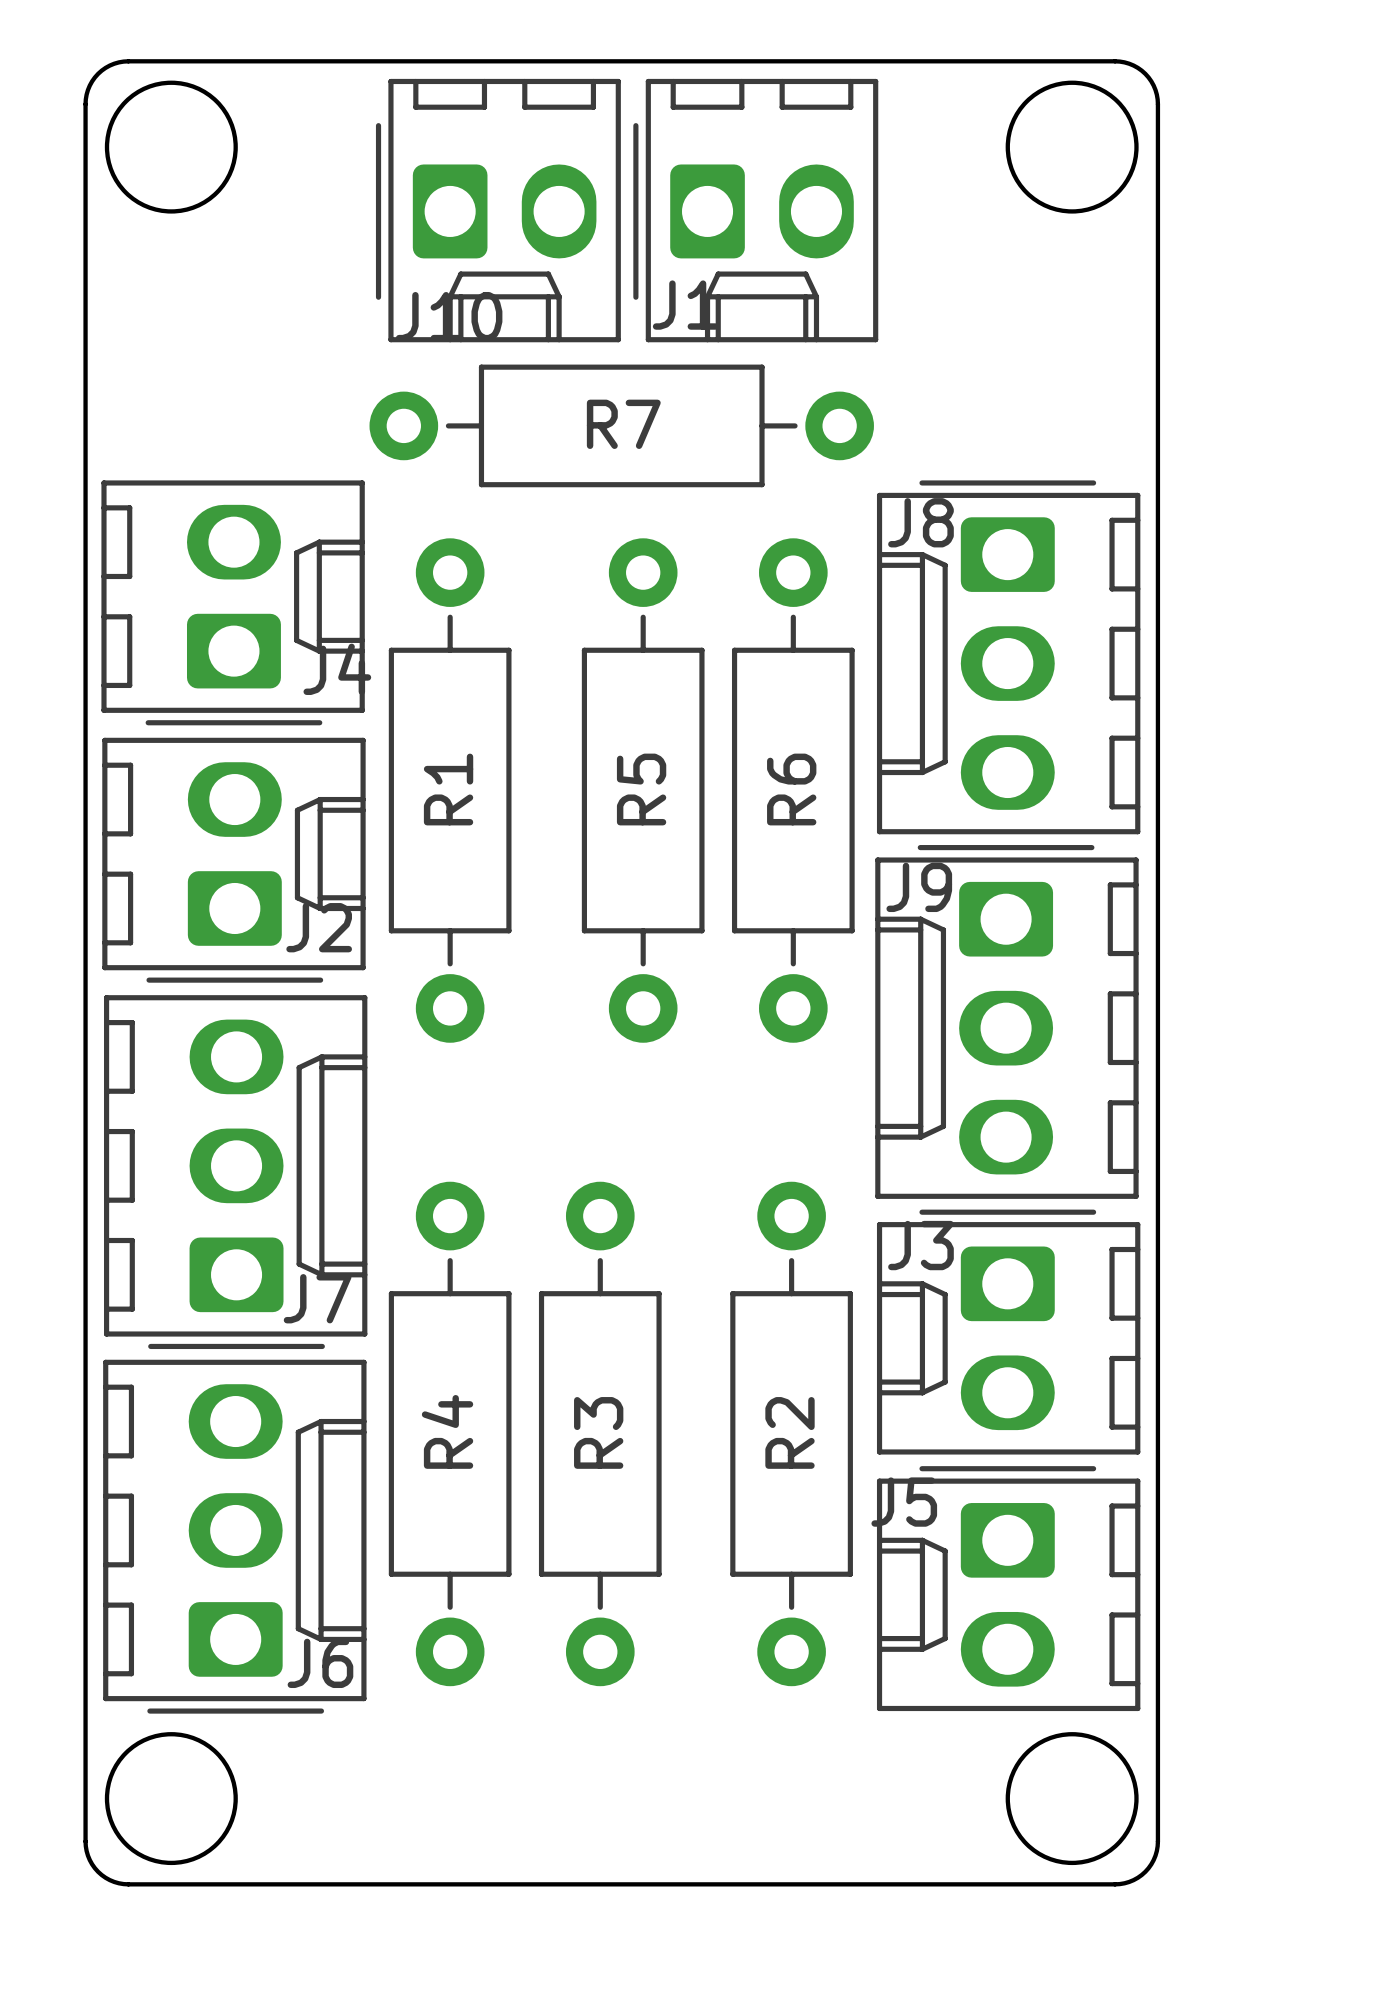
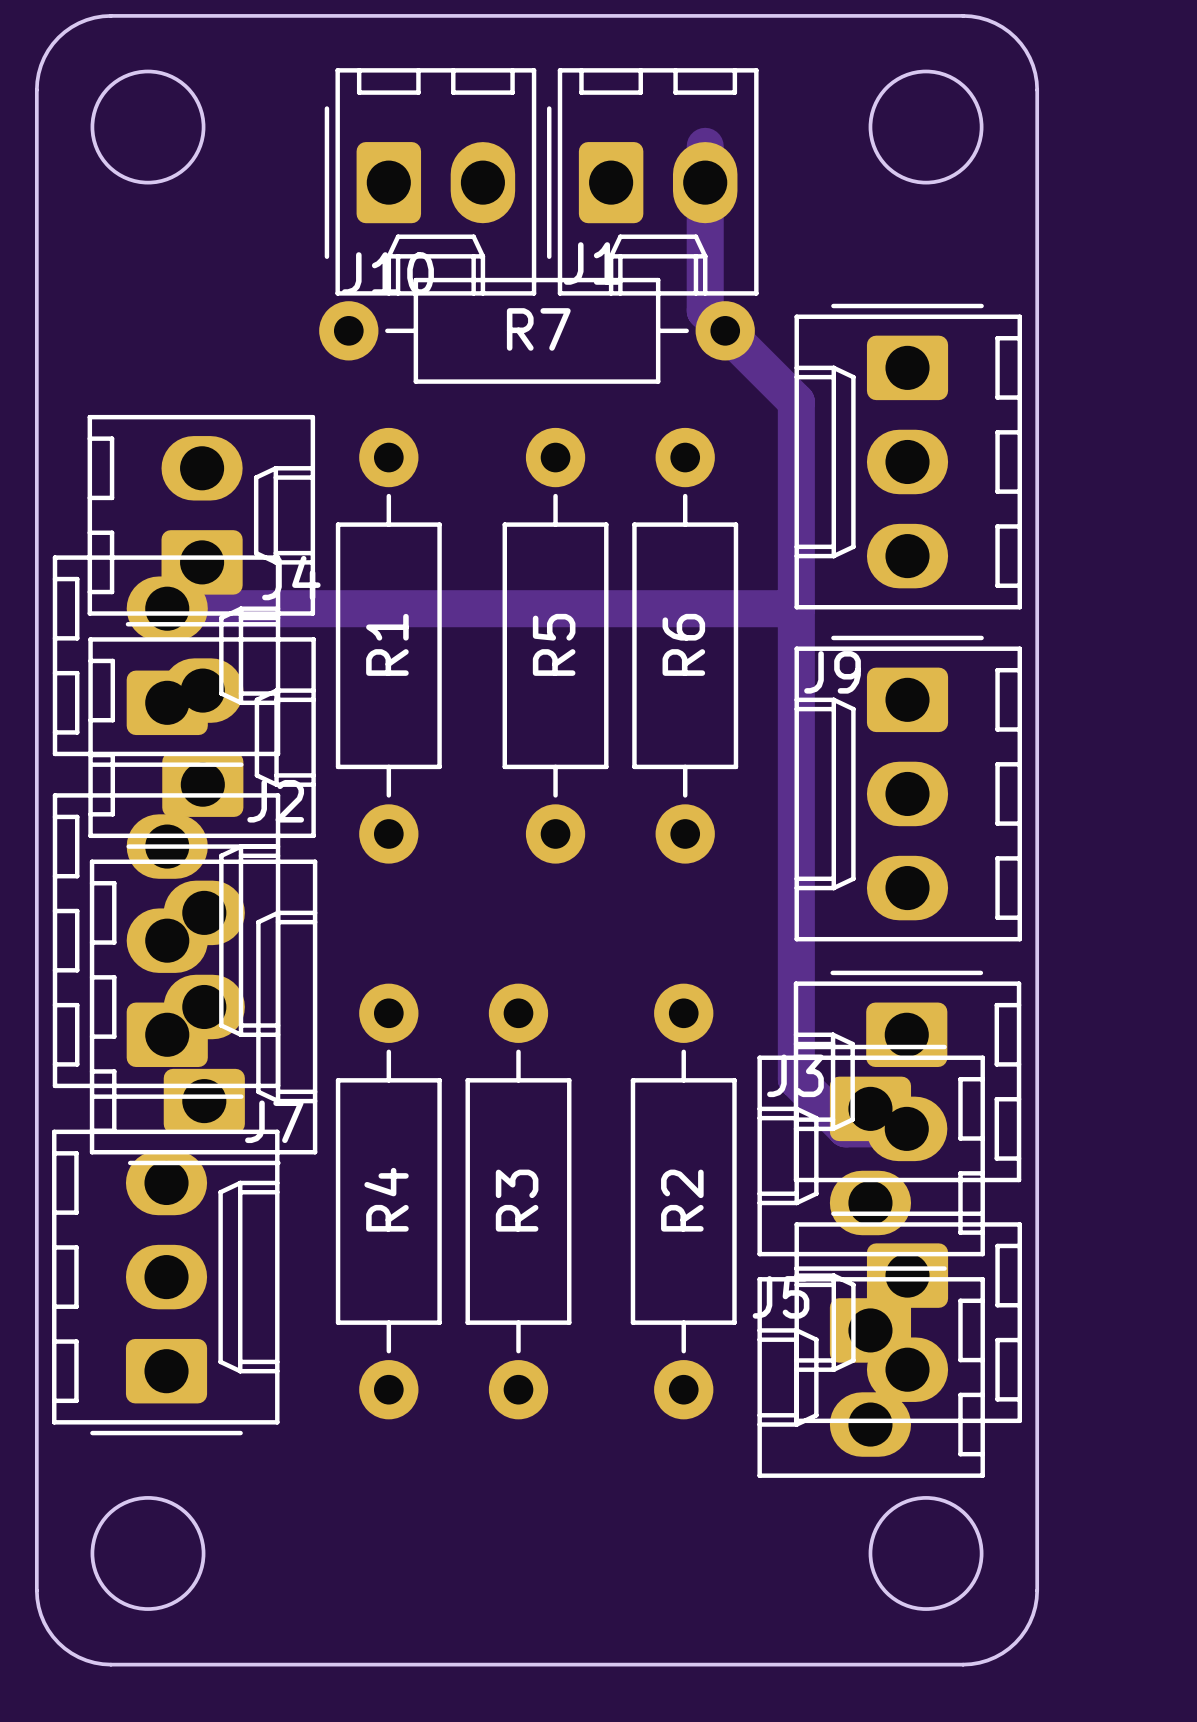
board edge: (128, 61) (1115, 61) (1124, 62) (1137, 67) (1151, 81) (1156, 94) (1157, 104) (1157, 1841) (1153, 1860) (1148, 1868) (1137, 1877) (1124, 1883) (1115, 1884) (128, 1884) (118, 1883) (105, 1877) (92, 1864) (87, 1855) (85, 1841) (85, 104) (87, 90) (98, 73) (114, 63) (128, 61) -> (110, 15) (94, 17) (78, 23) (58, 37) (48, 50) (41, 65) (36, 90) (36, 1590) (38, 1607) (44, 1622) (53, 1636) (71, 1653) (94, 1662) (110, 1664) (963, 1664) (979, 1662) (995, 1657) (1009, 1648) (1025, 1629) (1035, 1607) (1037, 1590) (1037, 90) (1035, 73) (1029, 57) (1021, 43) (1002, 27) (987, 20) (963, 15) (110, 15)
track: none -> (705, 146) (705, 310) (796, 401) (796, 1079) (845, 1128) (906, 1128)
R7 position: (621, 425) -> (537, 330)
part: none -> (908, 456)
J8: (1008, 657) -> none
track: none -> (167, 608) (796, 608)
part: none -> (166, 661)
R1 position: (450, 790) -> (388, 645)
R5 position: (643, 790) -> (555, 645)
R6 position: (793, 790) -> (685, 645)
J9 position: (1006, 1021) -> (908, 788)
part: none -> (166, 946)
part: none -> (907, 1076)
R4 position: (450, 1433) -> (388, 1201)
R3 position: (600, 1433) -> (518, 1201)
R2 position: (791, 1433) -> (683, 1201)
part: none -> (165, 1282)
part: none -> (908, 1317)
J6: (234, 1536) -> none

